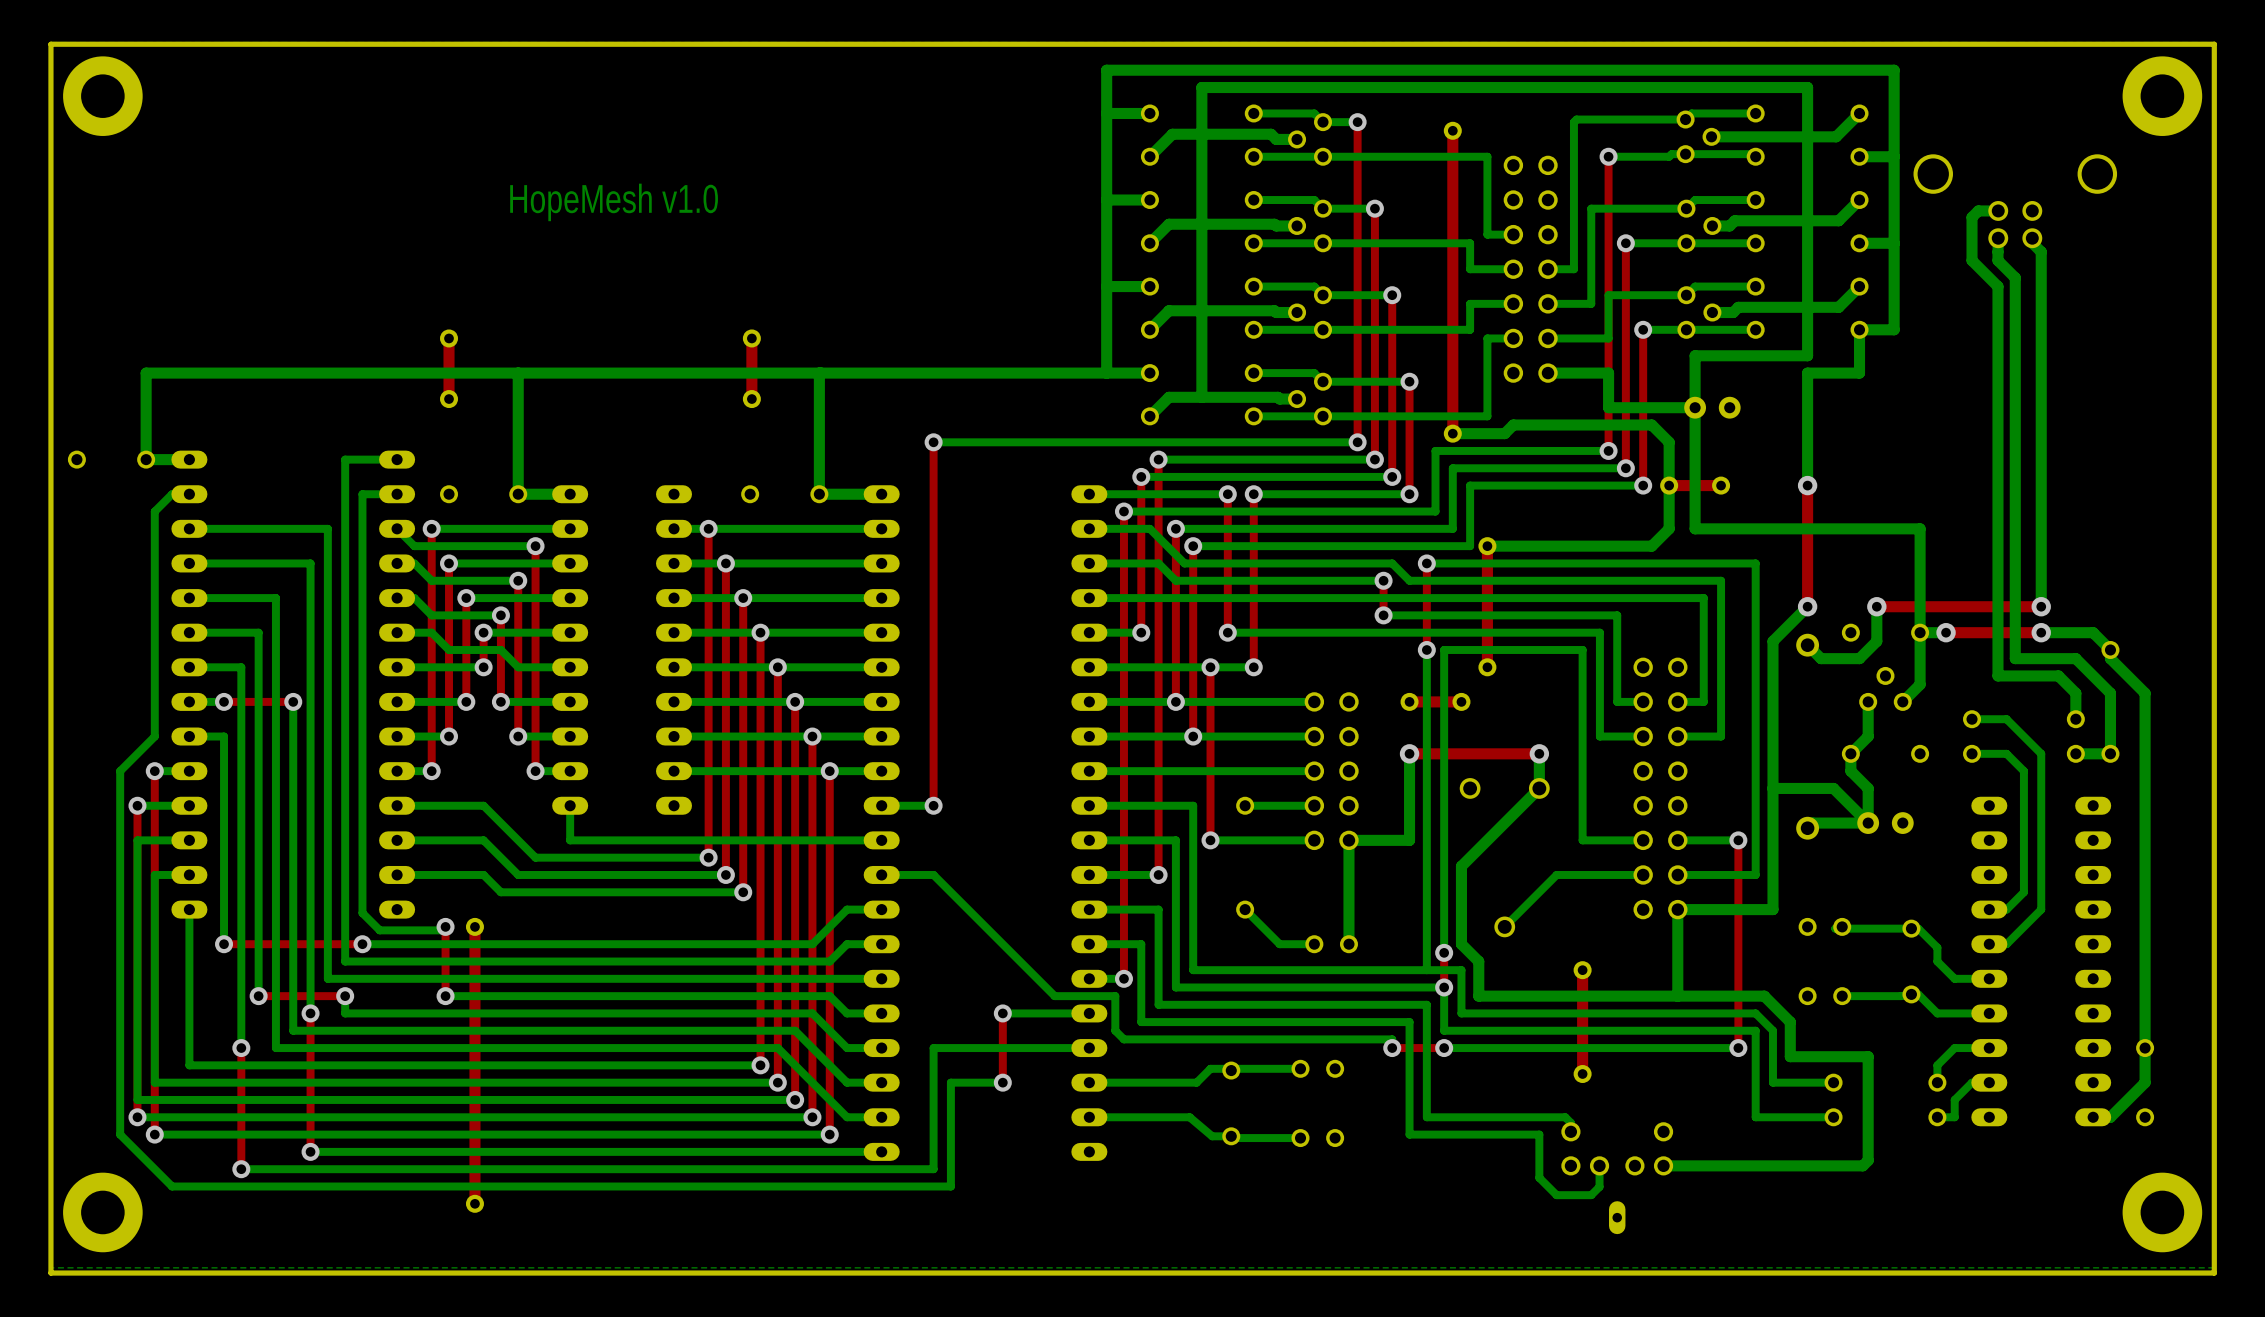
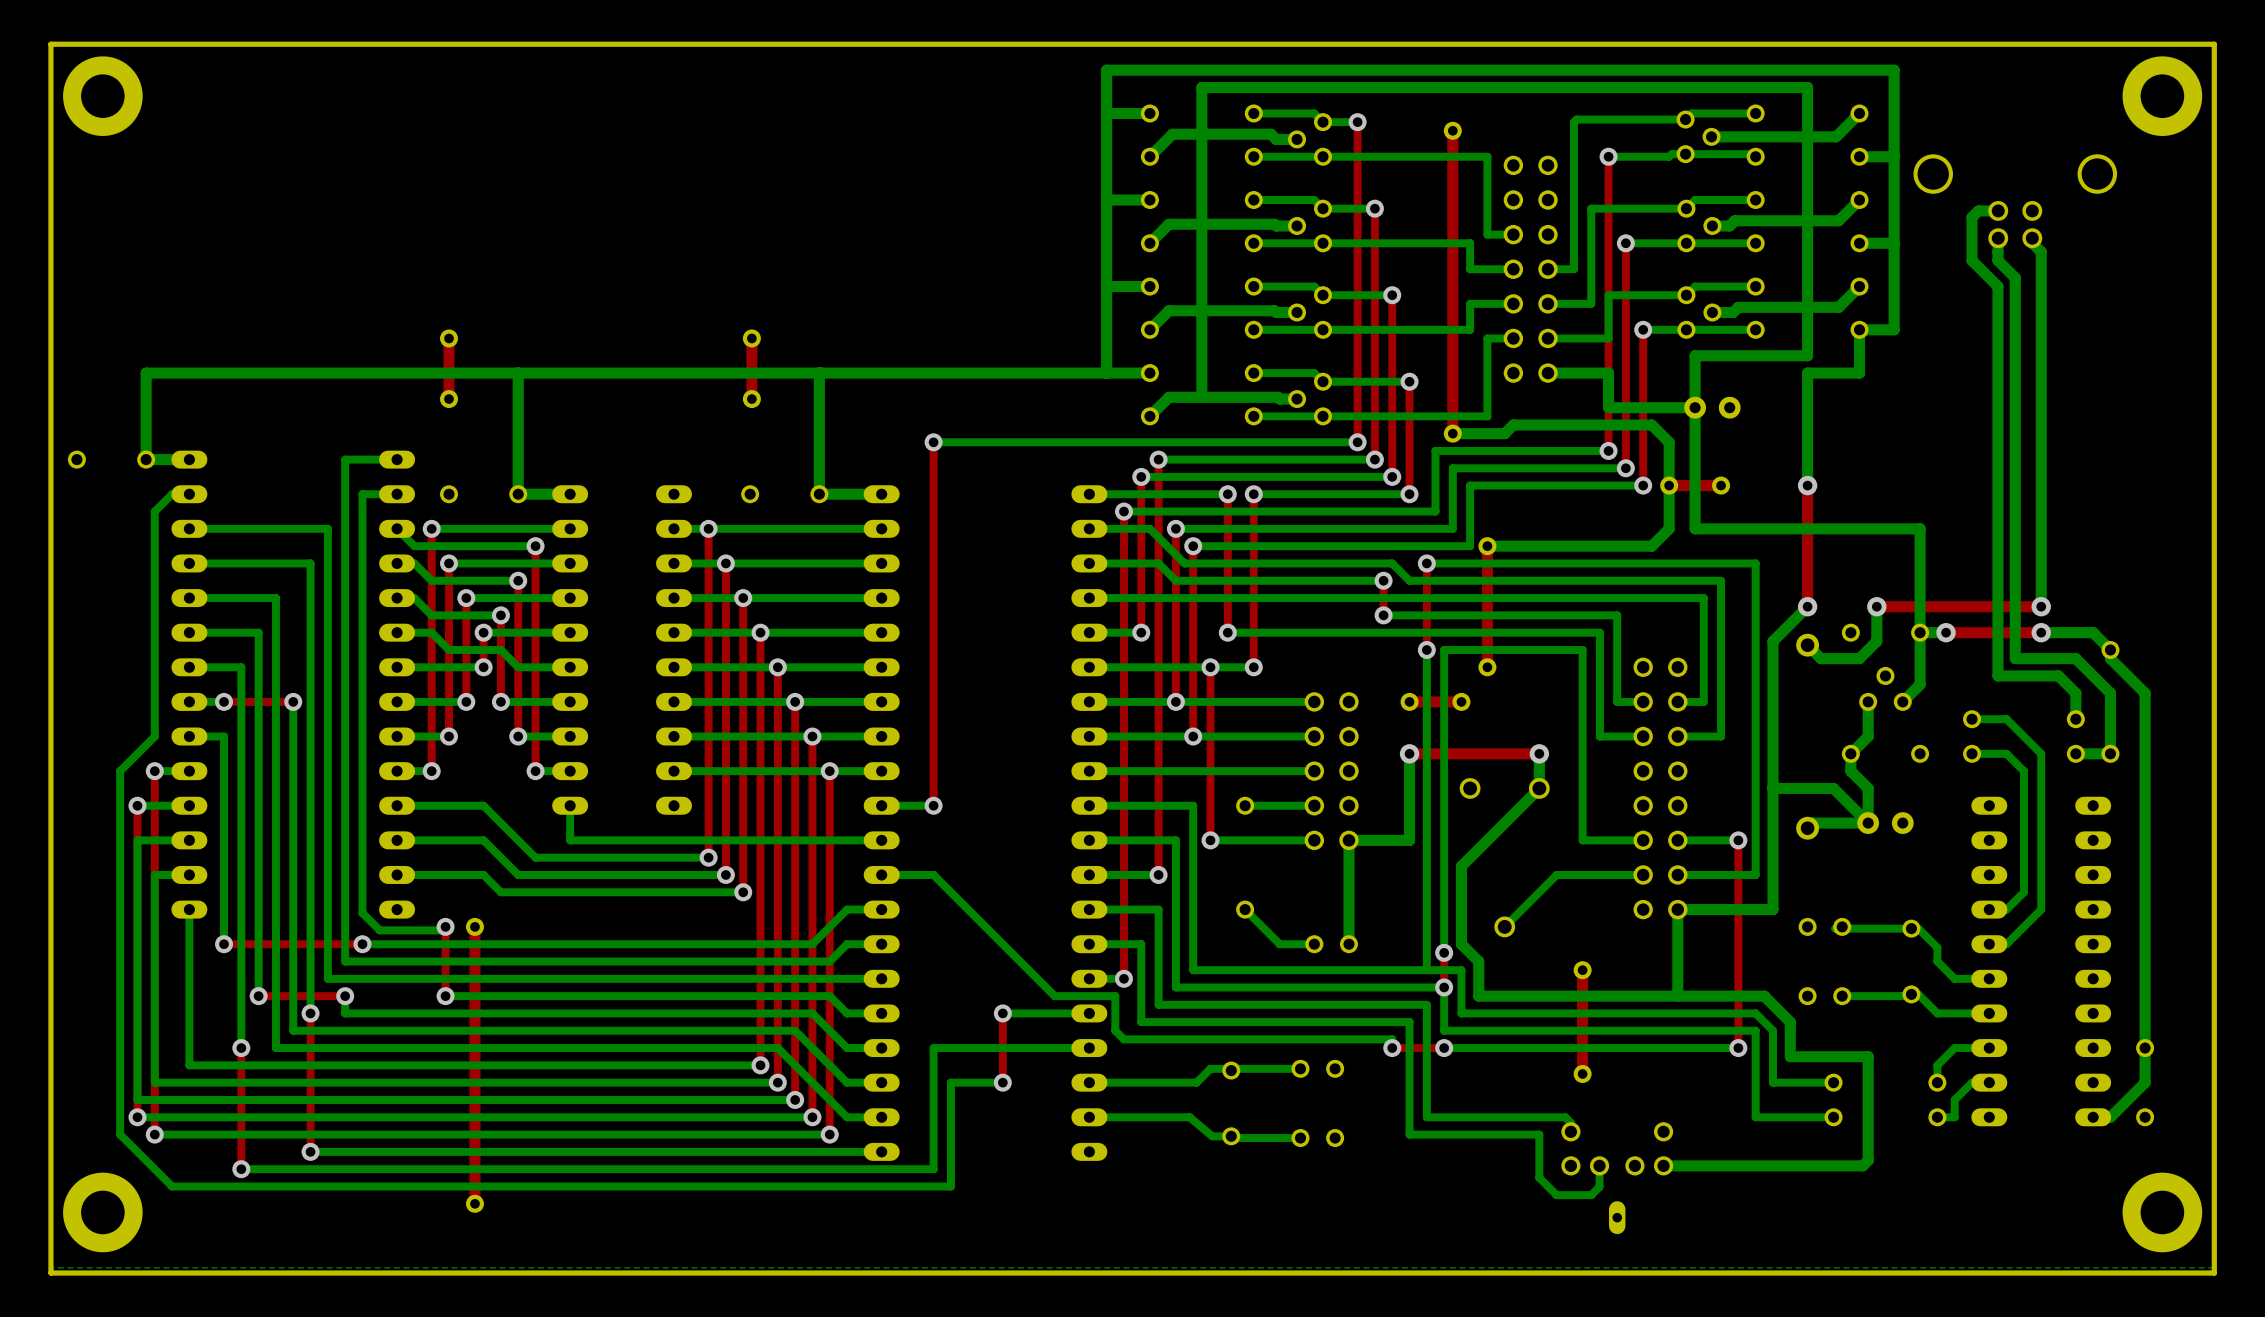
text: HopeMesh v1.0 (614, 202) -> none

